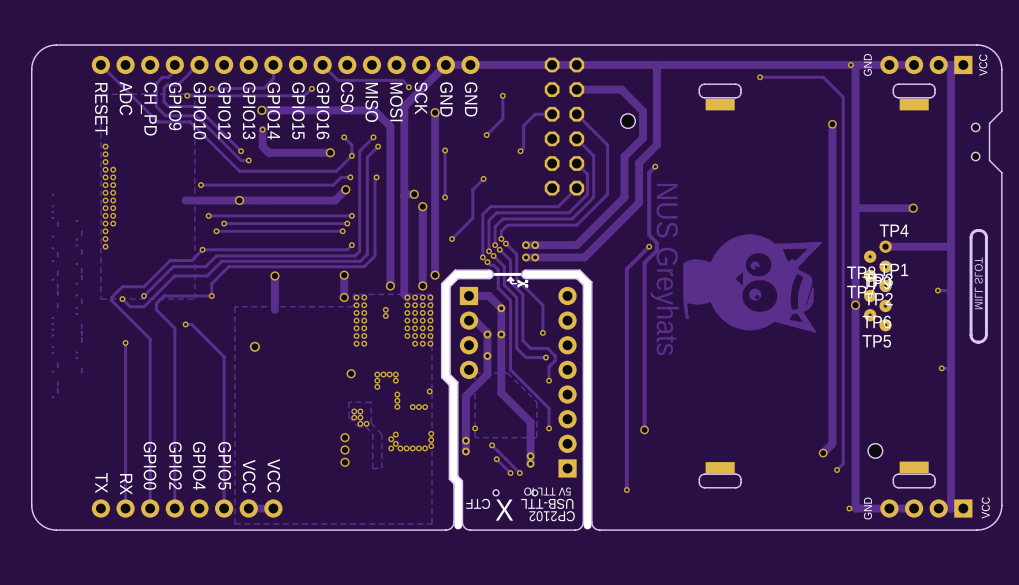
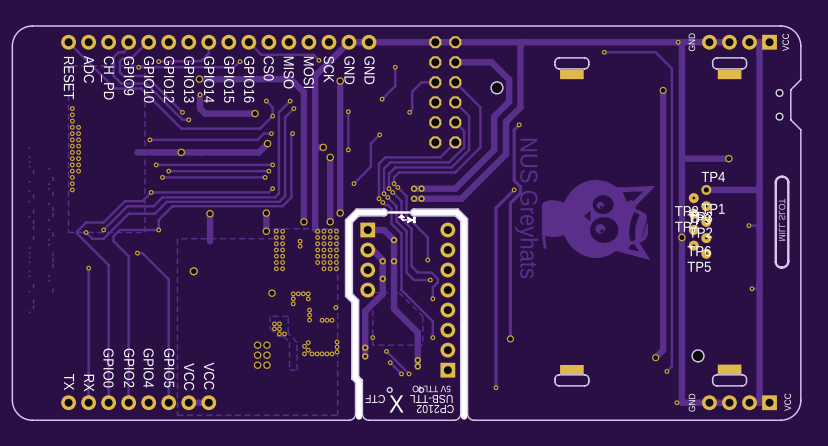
via: none -> (257, 345)
via: none -> (257, 355)
via: none -> (257, 365)

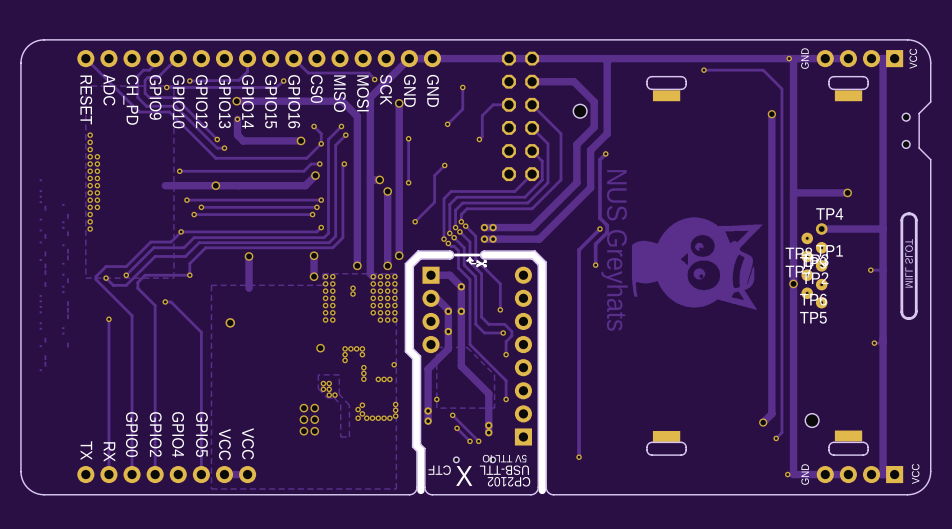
track: (510, 221) (510, 338) -> none
via: none -> (595, 265)
via: (510, 338) -> none

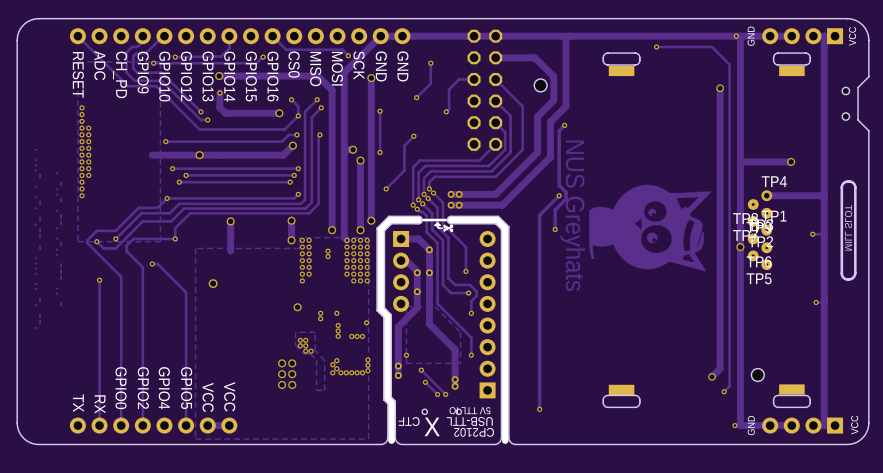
via: (332, 320) -> none
via: (345, 348) -> none
via: (350, 348) -> none
via: (356, 348) -> none
via: (362, 348) -> none

